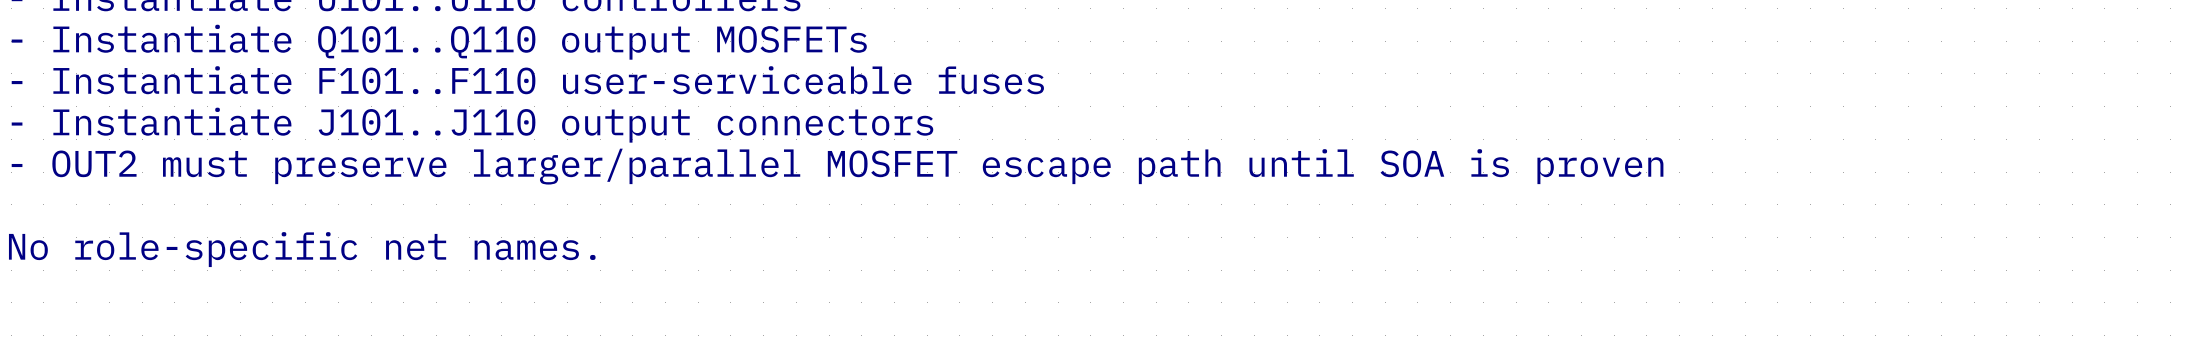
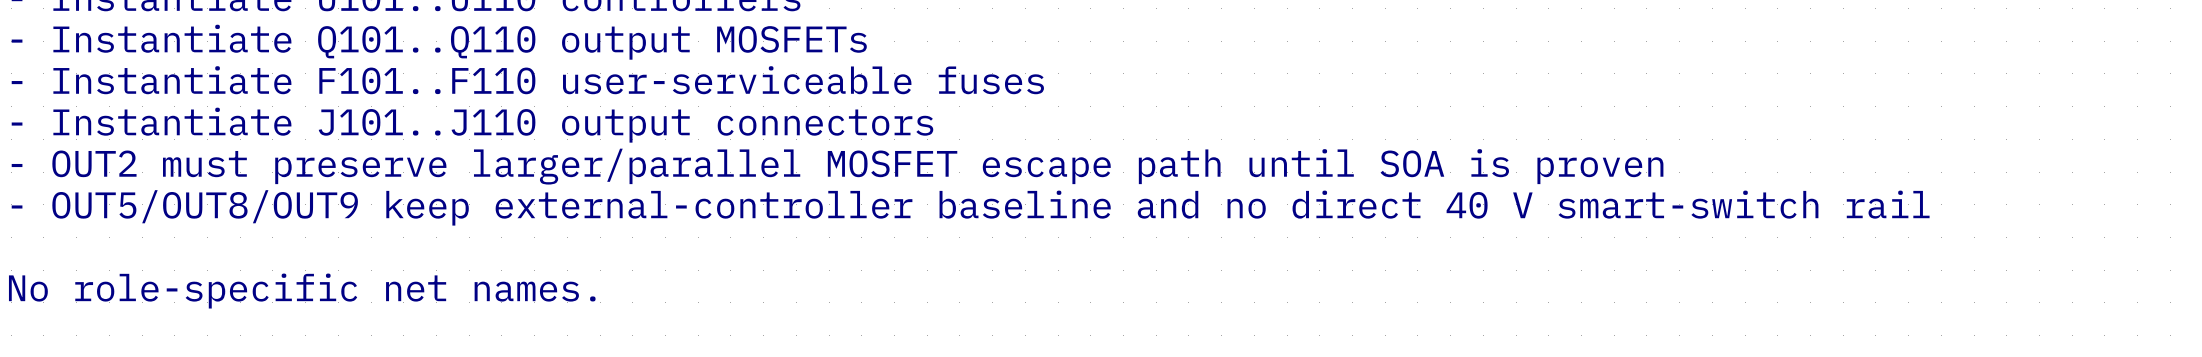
text: none -> - OUT5/OUT8/OUT9 keep external-controller baseline and no direct 40 V smart-switch rail (970, 207)
text position: No role-specific net names. (302, 249) -> No role-specific net names. (302, 291)

